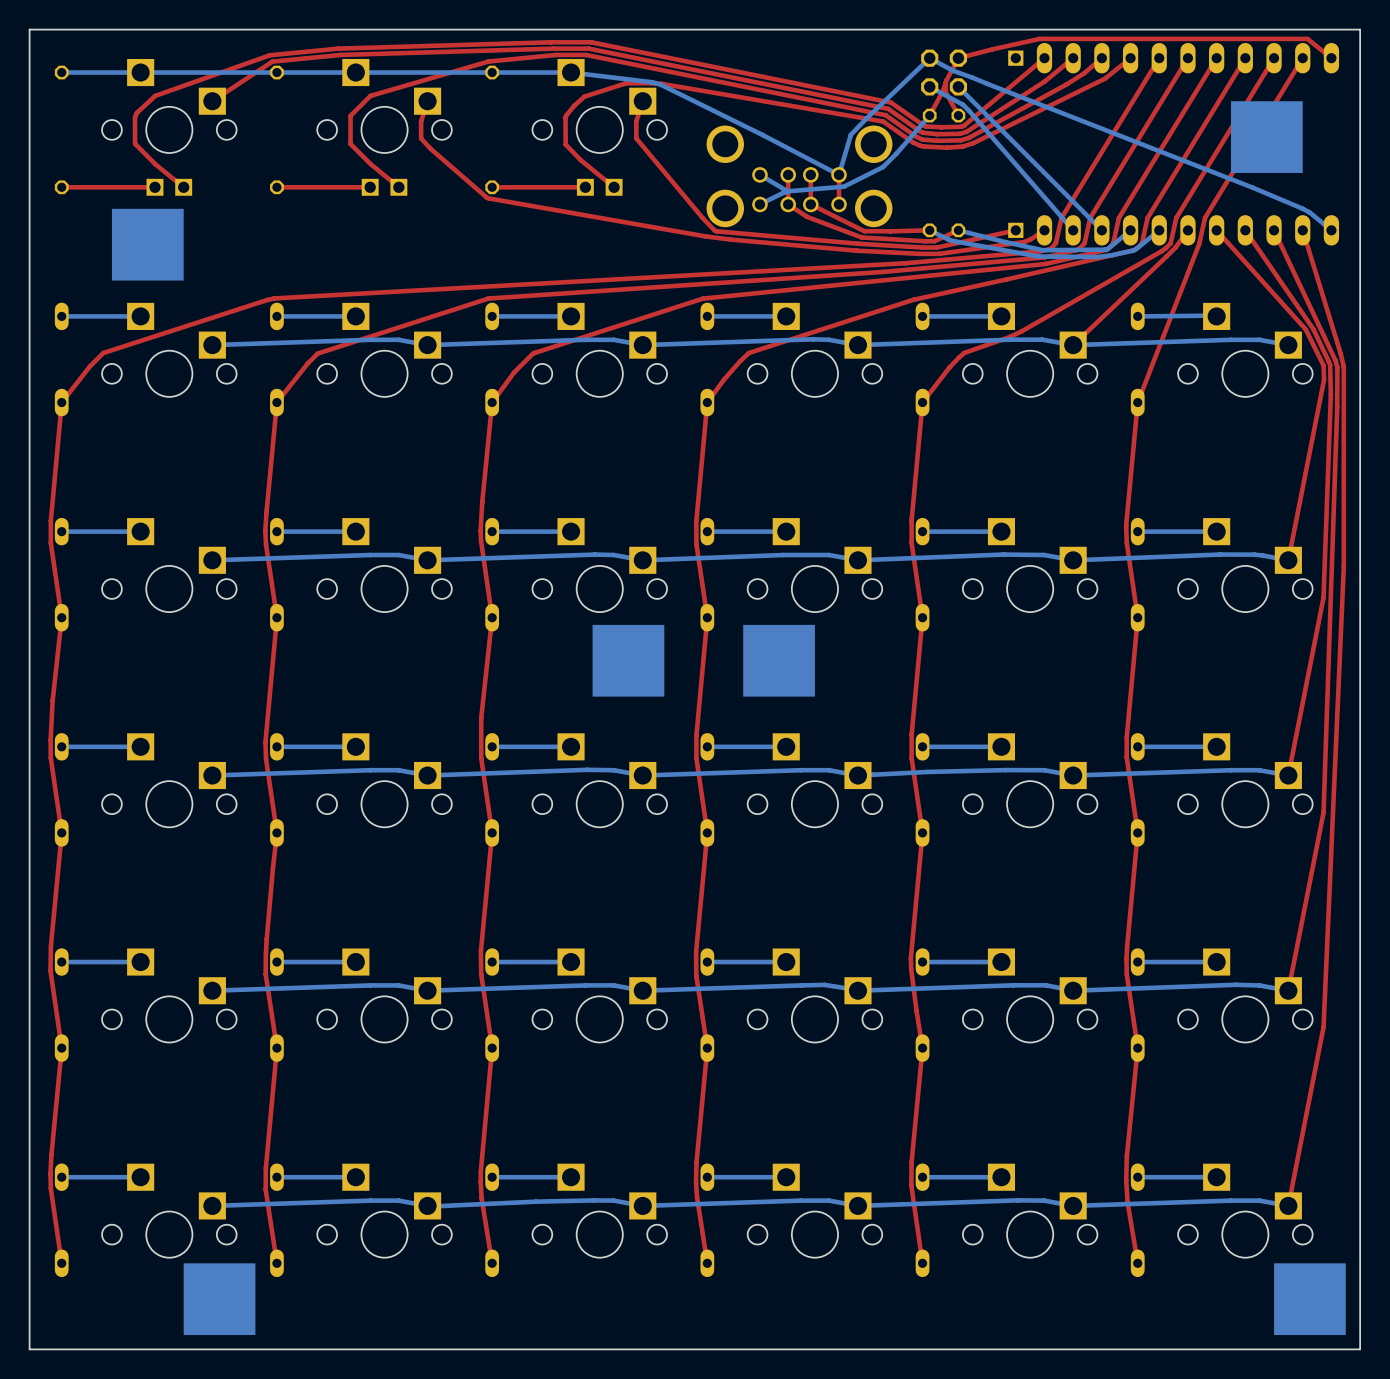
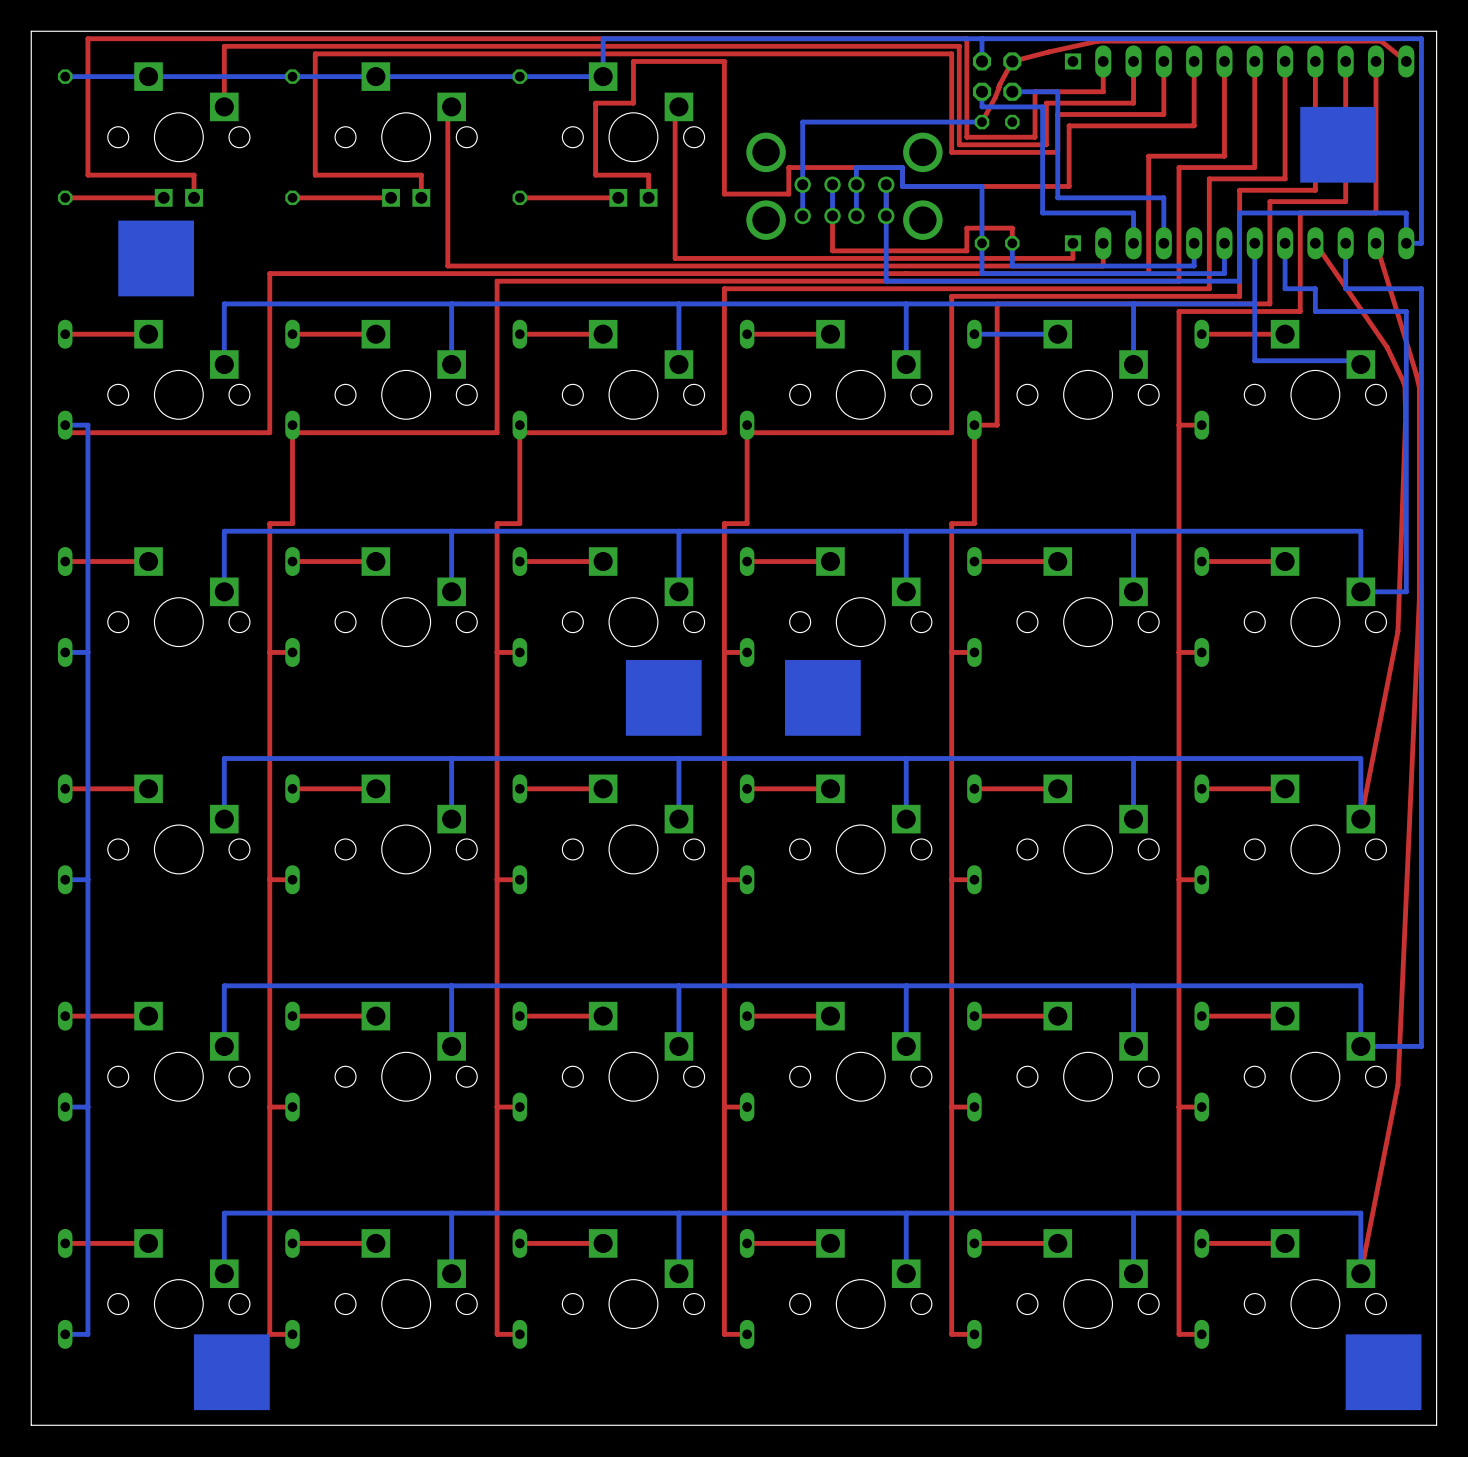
bottom track: none -> (982, 38) (982, 61)
top track: (1044, 58) (963, 126) (941, 127) (923, 125) (890, 102) (591, 42) (338, 48) (269, 55) (155, 95) (136, 112) (134, 117) (135, 143) (155, 164) (183, 187) -> (1103, 61) (1103, 91) (1035, 91) (1035, 137) (966, 137) (966, 38) (87, 38) (87, 175) (194, 175) (194, 197)
top track: (1073, 58) (1044, 81) (966, 131) (959, 133) (922, 132) (888, 108) (588, 48) (340, 54) (272, 61) (212, 101) -> (1133, 61) (1133, 103) (1046, 103) (1046, 144) (959, 144) (959, 46) (224, 46) (224, 106)
top track: (1101, 58) (1084, 73) (1066, 84) (968, 137) (960, 140) (936, 140) (922, 139) (915, 136) (885, 115) (586, 54) (555, 54) (488, 61) (370, 95) (350, 115) (350, 144) (370, 163) (398, 187) -> (1163, 61) (1163, 114) (1057, 114) (1057, 152) (951, 152) (951, 53) (315, 53) (315, 175) (421, 175) (421, 197)
top track: (1130, 58) (1105, 78) (973, 143) (962, 146) (947, 147) (920, 145) (883, 121) (661, 83) (626, 83) (584, 96) (565, 117) (565, 144) (580, 160) (614, 187) -> (1194, 61) (1194, 125) (1069, 125) (1069, 186) (902, 186) (902, 167) (788, 167) (788, 194) (724, 194) (724, 61) (633, 61) (633, 103) (595, 103) (595, 175) (648, 175) (648, 197)
top track: (1159, 58) (1061, 217) (1055, 242) (1049, 249) (905, 263) (274, 298) (103, 353) (90, 366) (61, 402) (50, 520) (50, 543) (61, 617) (52, 700) (50, 757) (61, 832) (50, 945) (50, 970) (61, 1048) (50, 1174) (61, 1263) -> (1224, 61) (1224, 156) (1148, 156) (1148, 273) (269, 273) (269, 432) (65, 432) (65, 425)
top track: (1187, 58) (1090, 217) (1084, 243) (1076, 250) (1044, 257) (883, 271) (488, 298) (317, 353) (276, 402) (265, 530) (276, 617) (265, 742) (266, 759) (276, 832) (265, 954) (265, 974) (276, 1048) (265, 1168) (265, 1189) (276, 1263) -> (1254, 61) (1254, 167) (1179, 167) (1179, 281) (497, 281) (497, 432) (292, 432)
top track: (1216, 58) (1118, 217) (1113, 242) (1106, 249) (1046, 263) (702, 298) (532, 353) (514, 372) (492, 402) (480, 530) (492, 617) (481, 717) (481, 758) (492, 832) (480, 951) (481, 974) (492, 1048) (480, 1181) (492, 1263) -> (519, 425) (519, 523) (497, 523) (497, 1334) (519, 1334)
top track: none -> (1285, 61) (1285, 178) (1209, 178) (1209, 288) (724, 288) (724, 432) (519, 432)
top track: (1245, 58) (1147, 217) (1141, 243) (1136, 248) (913, 299) (748, 353) (724, 379) (707, 402) (696, 520) (696, 544) (707, 617) (696, 735) (696, 758) (707, 832) (696, 952) (696, 975) (707, 1048) (696, 1183) (707, 1263) -> (747, 425) (747, 523) (724, 523) (724, 1334) (747, 1334)
top track: none -> (1315, 61) (1315, 190) (1239, 190) (1239, 296) (951, 296) (951, 432) (747, 432)
top track: (1274, 58) (1176, 217) (1170, 243) (1166, 247) (1021, 331) (964, 352) (949, 367) (922, 402) (911, 520) (911, 543) (922, 617) (911, 734) (911, 758) (922, 832) (910, 958) (922, 1048) (911, 1162) (911, 1185) (922, 1263) -> (1345, 61) (1345, 201) (1269, 201) (1269, 303) (997, 303) (997, 425) (974, 425) (974, 523) (951, 523) (951, 1334) (974, 1334)
top track: (1302, 58) (1205, 217) (1199, 244) (1137, 402) (1126, 525) (1126, 543) (1137, 617) (1126, 737) (1126, 757) (1137, 832) (1126, 958) (1126, 974) (1137, 1048) (1126, 1180) (1127, 1202) (1137, 1263) -> (1375, 61) (1375, 212) (1300, 212) (1300, 311) (1179, 311) (1179, 1334) (1201, 1334)
bottom track: (571, 72) (660, 84) (839, 174) (850, 134) (929, 58) (953, 70) (1302, 208) (1331, 230) -> (603, 76) (603, 38) (1421, 38) (1421, 243) (1406, 243) (1406, 212) (1239, 212) (1239, 281) (886, 281) (886, 184)
top track: (945, 84) (945, 92) (958, 115) -> none
bottom track: (929, 86) (962, 104) (969, 111) (1073, 230) -> (982, 91) (982, 106) (1042, 106) (1042, 212) (1133, 212) (1133, 243)
bottom track: (958, 86) (1101, 230) -> (1012, 91) (1057, 91) (1057, 197) (1163, 197) (1163, 243)
top track: (427, 101) (421, 121) (421, 138) (488, 198) (705, 236) (856, 250) (939, 253) (1024, 241) (1044, 230) -> (451, 106) (447, 106) (447, 266) (1103, 266) (1103, 243)
top track: (642, 101) (636, 121) (636, 138) (714, 230) (858, 243) (936, 247) (1015, 230) -> (678, 106) (675, 106) (675, 258) (1072, 258) (1072, 243)
bottom track: (929, 115) (883, 167) (843, 186) (789, 191) (759, 204) -> (982, 122) (802, 122) (802, 215)
bottom track: (759, 174) (787, 191) -> none
bottom track: none -> (832, 184) (832, 215)
top track: (788, 174) (788, 204) (807, 216) (861, 237) (934, 241) (958, 230) -> (832, 215) (832, 250) (966, 250) (966, 228) (1012, 228) (1012, 243)
top track: (810, 174) (810, 204) (864, 231) (929, 230) -> none
bottom track: (1130, 230) (1107, 249) (1042, 250) (958, 230) -> (1194, 243) (1194, 266) (1012, 266) (1012, 243)
bottom track: (1159, 230) (1133, 250) (1097, 257) (1038, 256) (955, 241) (929, 230) -> (1224, 243) (1224, 273) (982, 273) (982, 186) (902, 186) (902, 167) (856, 167) (856, 215)
bottom track: none -> (1254, 243) (1254, 360) (1360, 360) (1360, 364)
top track: (1187, 230) (1175, 247) (1073, 345) -> none
top track: (1216, 230) (1305, 329) (1323, 365) (1324, 379) (1288, 560) -> none
top track: (1274, 230) (1337, 367) (1323, 812) (1288, 990) -> none
bottom track: none -> (451, 303) (451, 364)
bottom track: none -> (678, 303) (678, 364)
bottom track: none -> (906, 303) (906, 364)
bottom track: none -> (1133, 303) (1133, 364)
bottom track: (140, 316) (61, 316) -> none
top track: none -> (148, 334) (65, 334)
bottom track: (355, 316) (276, 316) -> none
top track: none -> (375, 334) (292, 334)
bottom track: (571, 316) (492, 316) -> none
top track: none -> (603, 334) (519, 334)
bottom track: (786, 316) (707, 316) -> none
top track: none -> (830, 334) (747, 334)
bottom track: (1216, 316) (1137, 316) -> none
top track: none -> (1285, 334) (1201, 334)
bottom track: (1288, 345) (1259, 339) (1073, 345) (1042, 339) (857, 345) (829, 339) (813, 339) (642, 345) (613, 339) (427, 345) (398, 339) (370, 339) (212, 345) -> (1254, 303) (224, 303) (224, 364)
bottom track: none -> (65, 425) (87, 425) (87, 1334) (65, 1334)
top track: none -> (292, 425) (292, 523) (269, 523) (269, 1334) (292, 1334)
top track: none -> (1201, 425) (1179, 425)
bottom track: none -> (451, 531) (451, 591)
bottom track: none -> (678, 531) (678, 591)
bottom track: none -> (906, 531) (906, 591)
bottom track: none -> (1133, 531) (1133, 591)
bottom track: (140, 531) (61, 531) -> none
top track: none -> (148, 561) (65, 561)
bottom track: (355, 531) (276, 531) -> none
top track: none -> (375, 561) (292, 561)
bottom track: (571, 531) (492, 531) -> none
top track: none -> (603, 561) (519, 561)
bottom track: (786, 531) (707, 531) -> none
top track: none -> (830, 561) (747, 561)
bottom track: (1001, 531) (922, 531) -> none
top track: none -> (1057, 561) (974, 561)
bottom track: (1216, 531) (1137, 531) -> none
top track: none -> (1285, 561) (1201, 561)
bottom track: (1288, 560) (1254, 554) (1220, 554) (1073, 560) (1044, 555) (1003, 554) (857, 560) (829, 555) (642, 560) (613, 555) (594, 554) (427, 560) (398, 555) (212, 560) -> (1285, 243) (1285, 288) (1315, 288) (1315, 311) (1406, 311) (1406, 591) (1360, 591) (1360, 531) (224, 531) (224, 591)
bottom track: none -> (87, 652) (65, 652)
top track: none -> (292, 652) (269, 652)
top track: none -> (519, 652) (497, 652)
top track: none -> (747, 652) (724, 652)
top track: none -> (974, 652) (951, 652)
top track: none -> (1201, 652) (1179, 652)
bottom track: none -> (451, 758) (451, 819)
bottom track: none -> (678, 758) (678, 819)
bottom track: none -> (906, 758) (906, 819)
bottom track: none -> (1133, 758) (1133, 819)
bottom track: (140, 746) (61, 746) -> none
top track: none -> (148, 788) (65, 788)
bottom track: (355, 746) (276, 746) -> none
top track: none -> (375, 788) (292, 788)
bottom track: (571, 746) (492, 746) -> none
top track: none -> (603, 788) (519, 788)
bottom track: (786, 746) (707, 746) -> none
top track: none -> (830, 788) (747, 788)
bottom track: (1001, 746) (922, 746) -> none
top track: none -> (1057, 788) (974, 788)
bottom track: (1216, 746) (1137, 746) -> none
top track: none -> (1285, 788) (1201, 788)
bottom track: (1288, 775) (1259, 770) (1073, 775) (1044, 770) (1005, 770) (857, 775) (829, 770) (642, 775) (613, 770) (587, 769) (427, 775) (398, 770) (212, 775) -> (1360, 819) (1360, 758) (224, 758) (224, 819)
bottom track: none -> (87, 879) (65, 879)
top track: none -> (292, 879) (269, 879)
top track: none -> (519, 879) (497, 879)
top track: none -> (747, 879) (724, 879)
top track: none -> (974, 879) (951, 879)
top track: none -> (1201, 879) (1179, 879)
bottom track: none -> (451, 985) (451, 1046)
bottom track: none -> (678, 985) (678, 1046)
bottom track: none -> (906, 985) (906, 1046)
bottom track: none -> (1133, 985) (1133, 1046)
bottom track: (140, 962) (61, 962) -> none
top track: none -> (148, 1016) (65, 1016)
bottom track: (355, 962) (276, 962) -> none
top track: none -> (375, 1016) (292, 1016)
bottom track: (571, 962) (492, 962) -> none
top track: none -> (603, 1016) (519, 1016)
bottom track: (786, 962) (707, 962) -> none
top track: none -> (830, 1016) (747, 1016)
bottom track: (1001, 962) (922, 962) -> none
top track: none -> (1057, 1016) (974, 1016)
bottom track: (1216, 962) (1137, 962) -> none
top track: none -> (1285, 1016) (1201, 1016)
bottom track: (1288, 990) (1259, 985) (1235, 984) (1073, 990) (1046, 985) (857, 990) (824, 984) (642, 990) (613, 985) (427, 990) (398, 985) (370, 985) (212, 990) -> (1345, 243) (1345, 288) (1421, 288) (1421, 1046) (1360, 1046) (1360, 985) (224, 985) (224, 1046)
bottom track: none -> (87, 1107) (65, 1107)
top track: none -> (292, 1107) (269, 1107)
top track: none -> (519, 1107) (497, 1107)
top track: none -> (747, 1107) (724, 1107)
top track: none -> (974, 1107) (951, 1107)
top track: none -> (1201, 1107) (1179, 1107)
bottom track: none -> (451, 1213) (451, 1273)
bottom track: none -> (678, 1213) (678, 1273)
bottom track: none -> (906, 1213) (906, 1273)
bottom track: none -> (1133, 1213) (1133, 1273)
bottom track: (140, 1177) (61, 1177) -> none
top track: none -> (148, 1243) (65, 1243)
bottom track: (355, 1177) (276, 1177) -> none
top track: none -> (375, 1243) (292, 1243)
bottom track: (571, 1177) (492, 1177) -> none
top track: none -> (603, 1243) (519, 1243)
bottom track: (786, 1177) (707, 1177) -> none
top track: none -> (830, 1243) (747, 1243)
bottom track: (1001, 1177) (922, 1177) -> none
top track: none -> (1057, 1243) (974, 1243)
bottom track: (1216, 1177) (1137, 1177) -> none
top track: none -> (1285, 1243) (1201, 1243)
bottom track: (1288, 1205) (1259, 1200) (1073, 1205) (1044, 1200) (1017, 1200) (857, 1205) (829, 1200) (642, 1205) (613, 1200) (594, 1200) (428, 1206) (398, 1200) (212, 1205) -> (1360, 1273) (1360, 1213) (224, 1213) (224, 1273)

